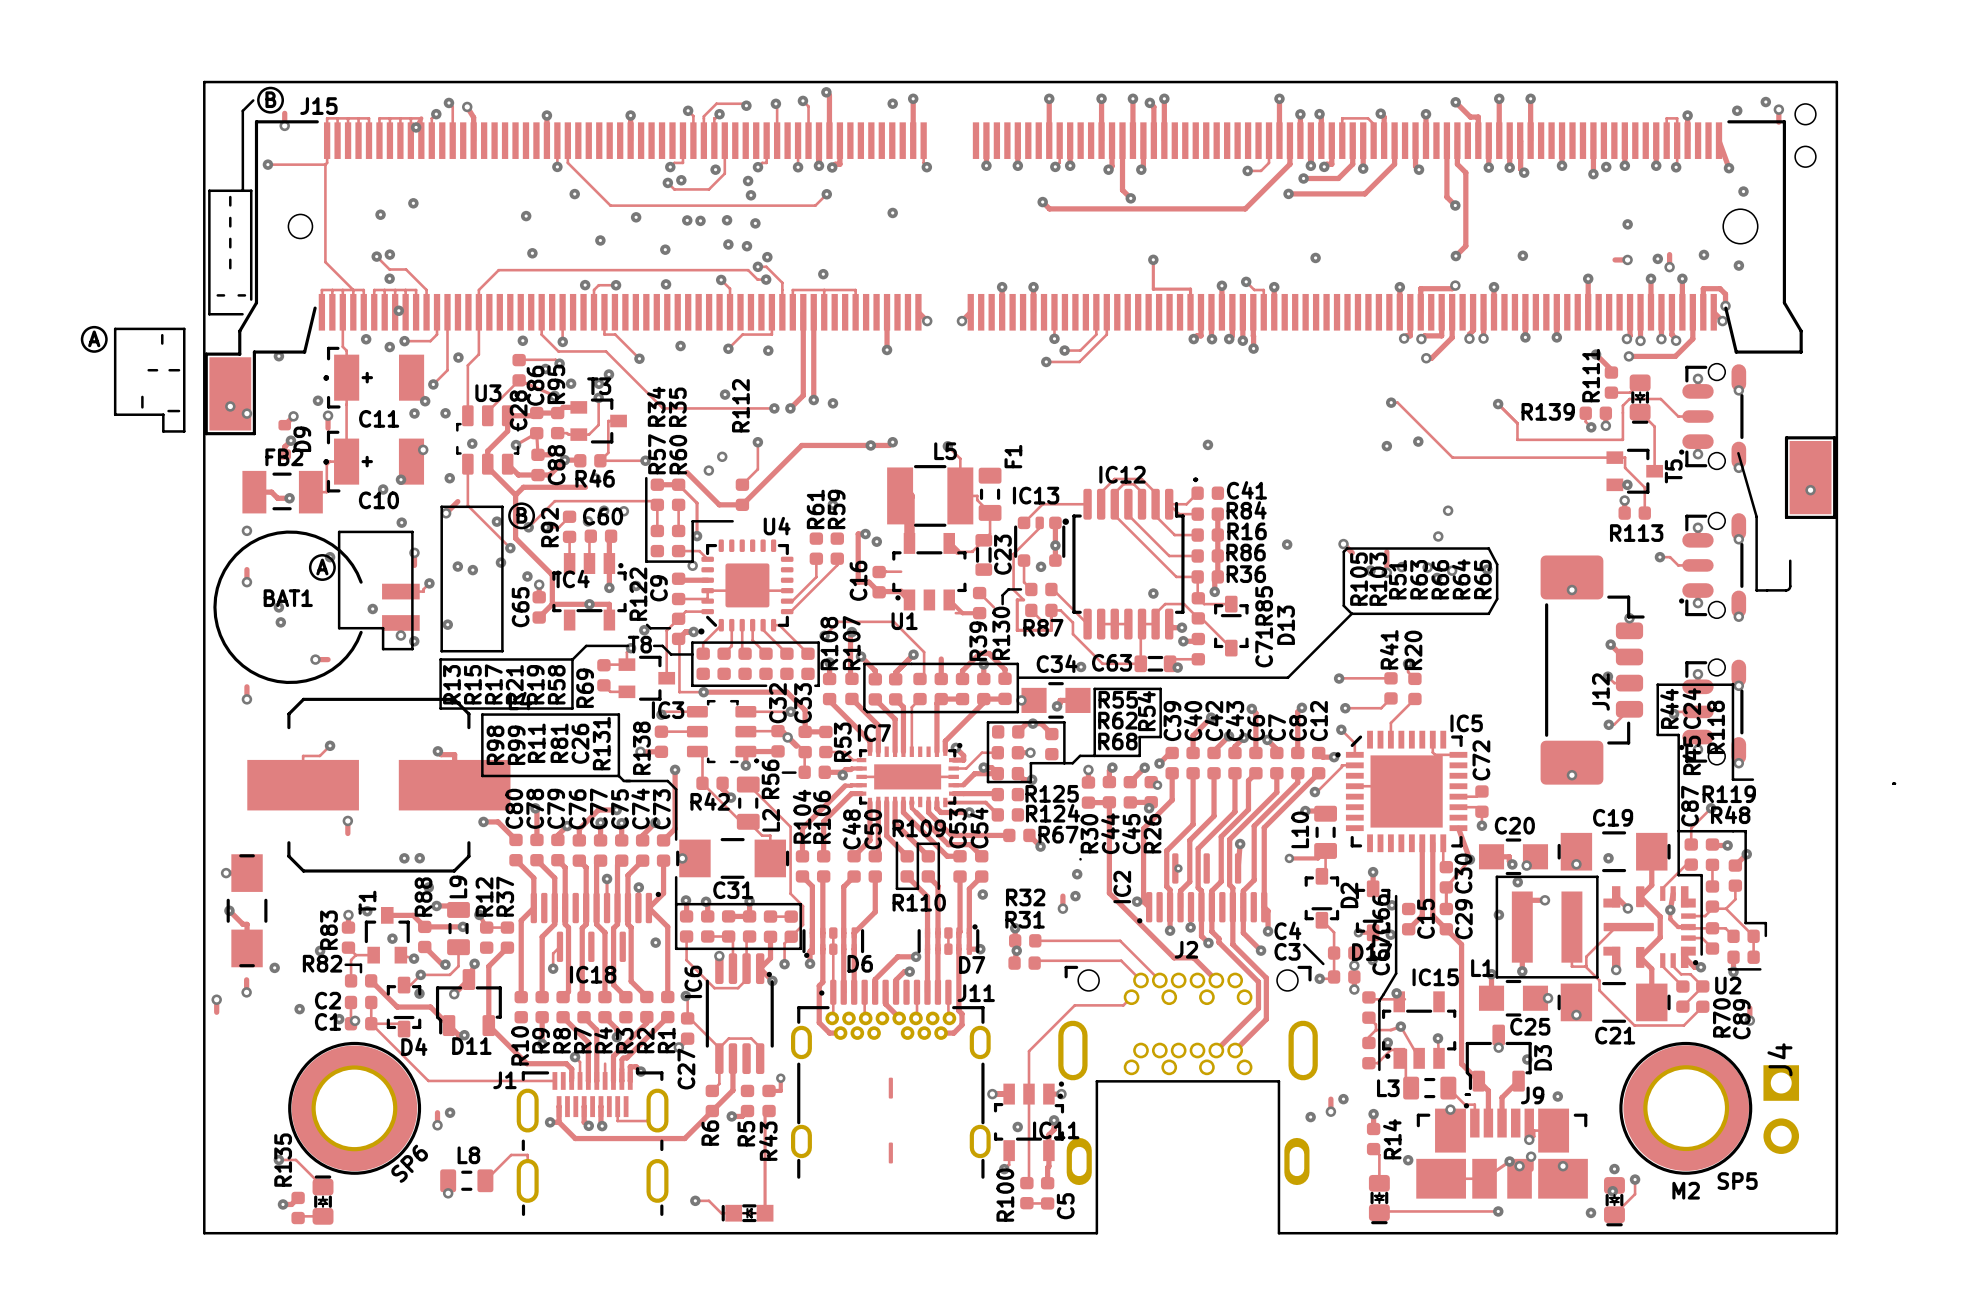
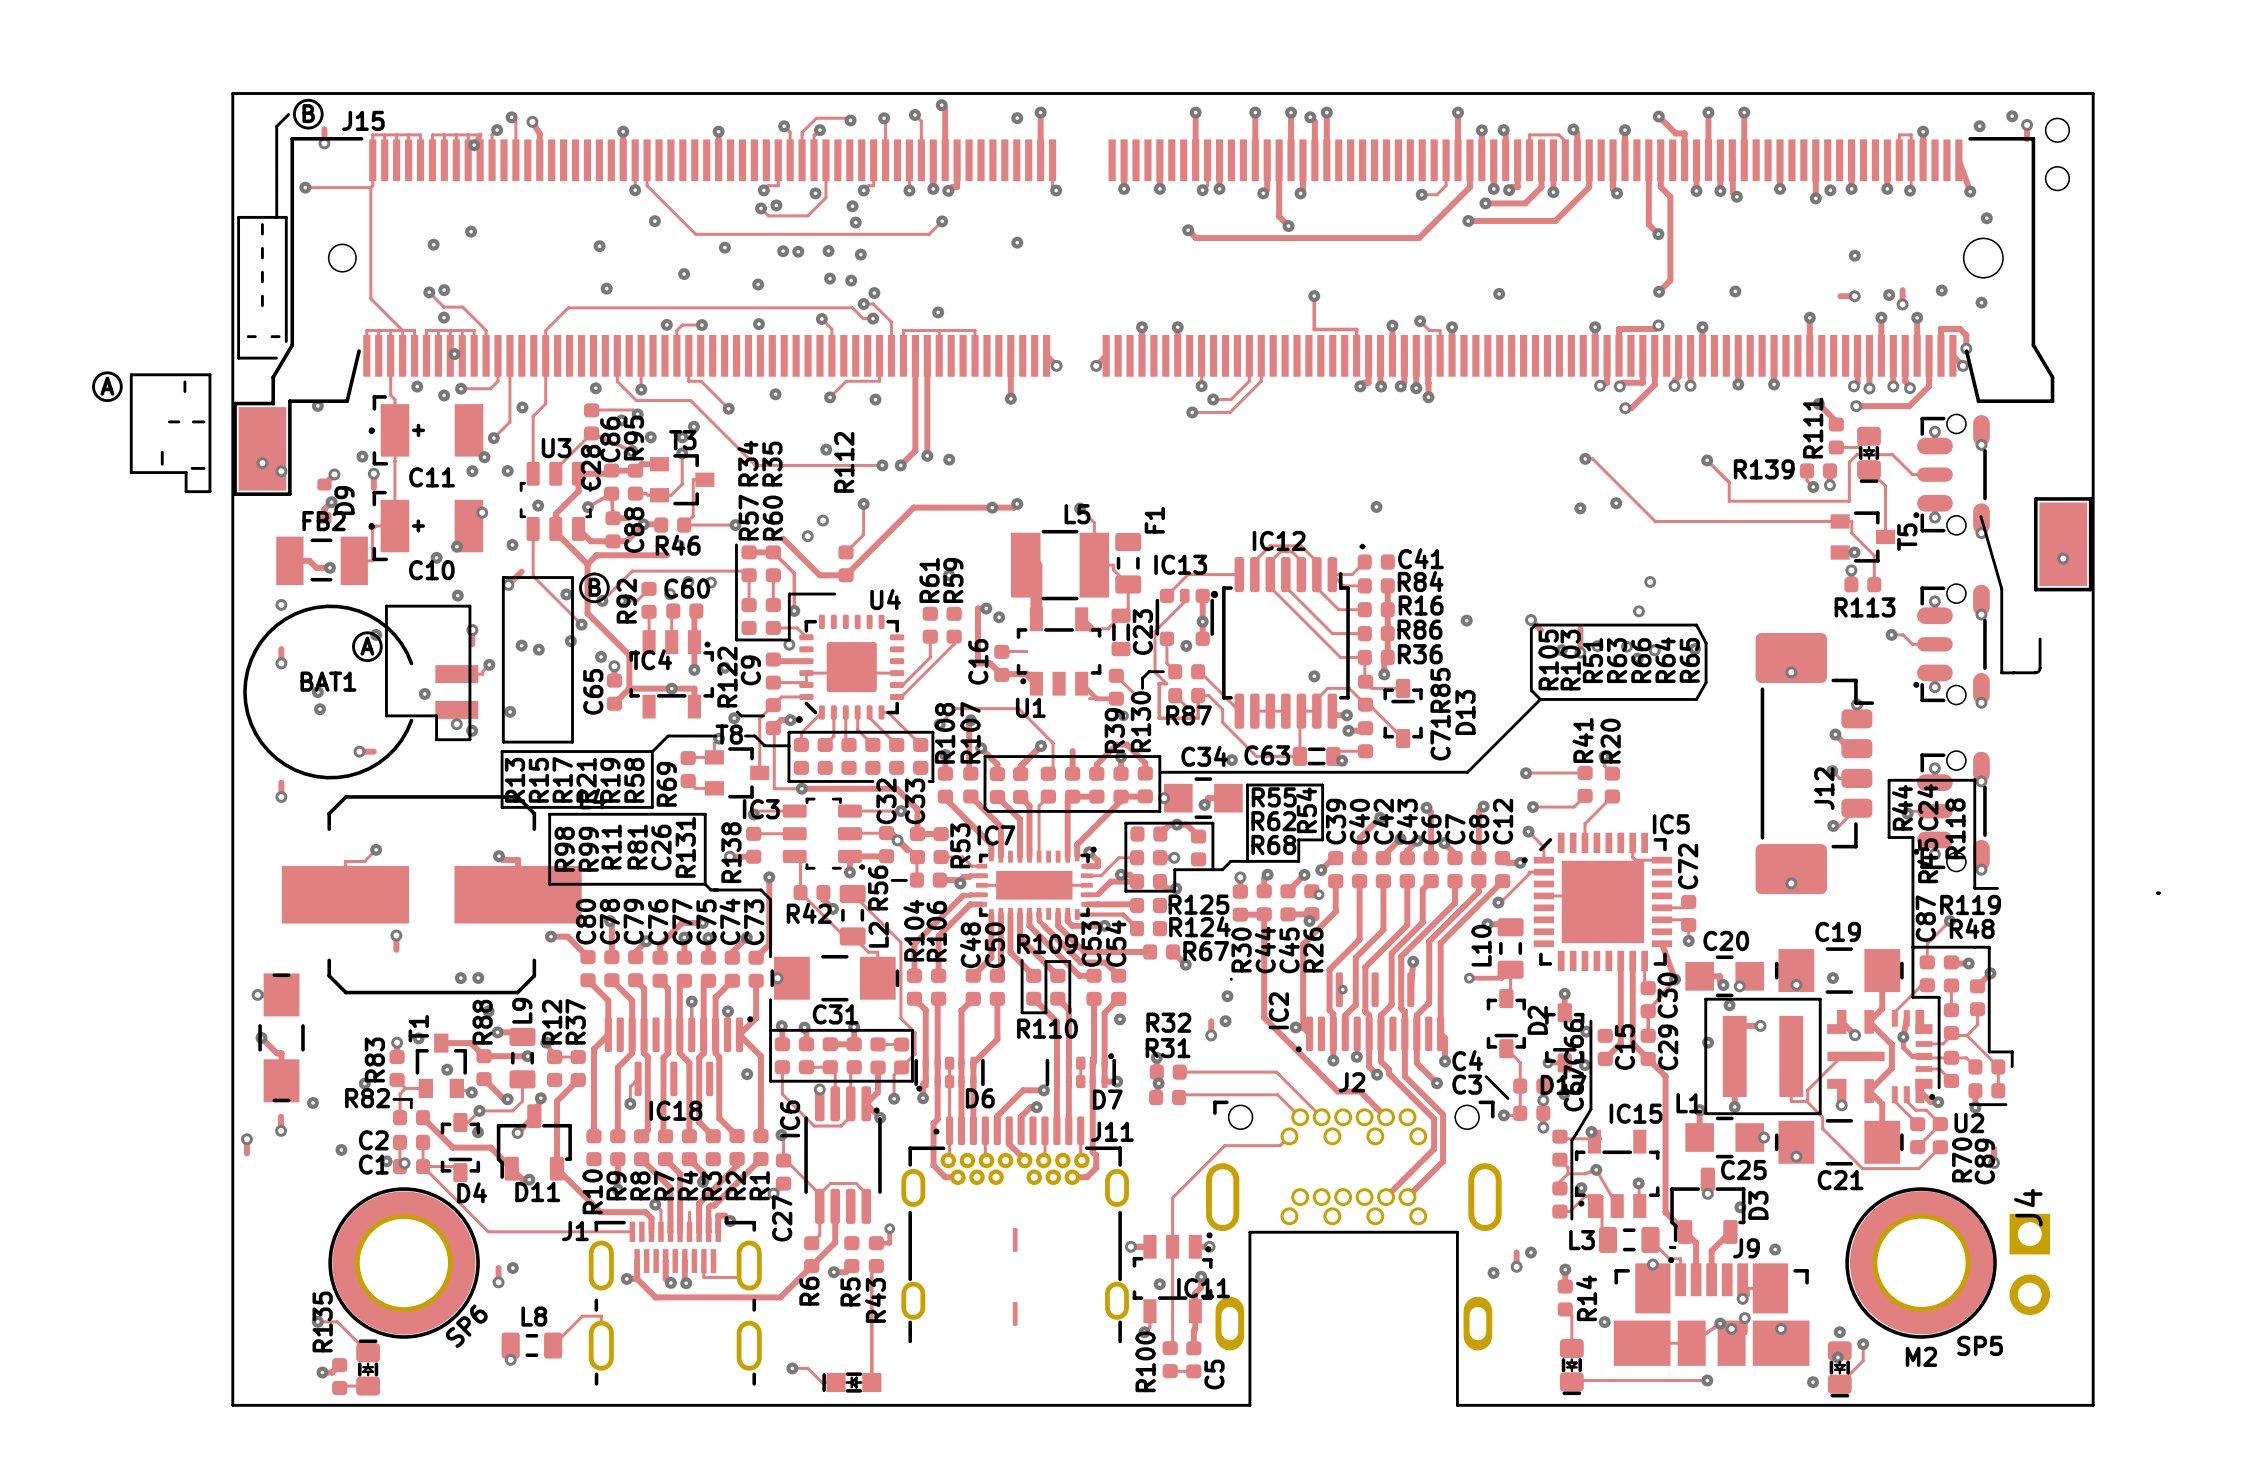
via: none -> (1123, 715)

